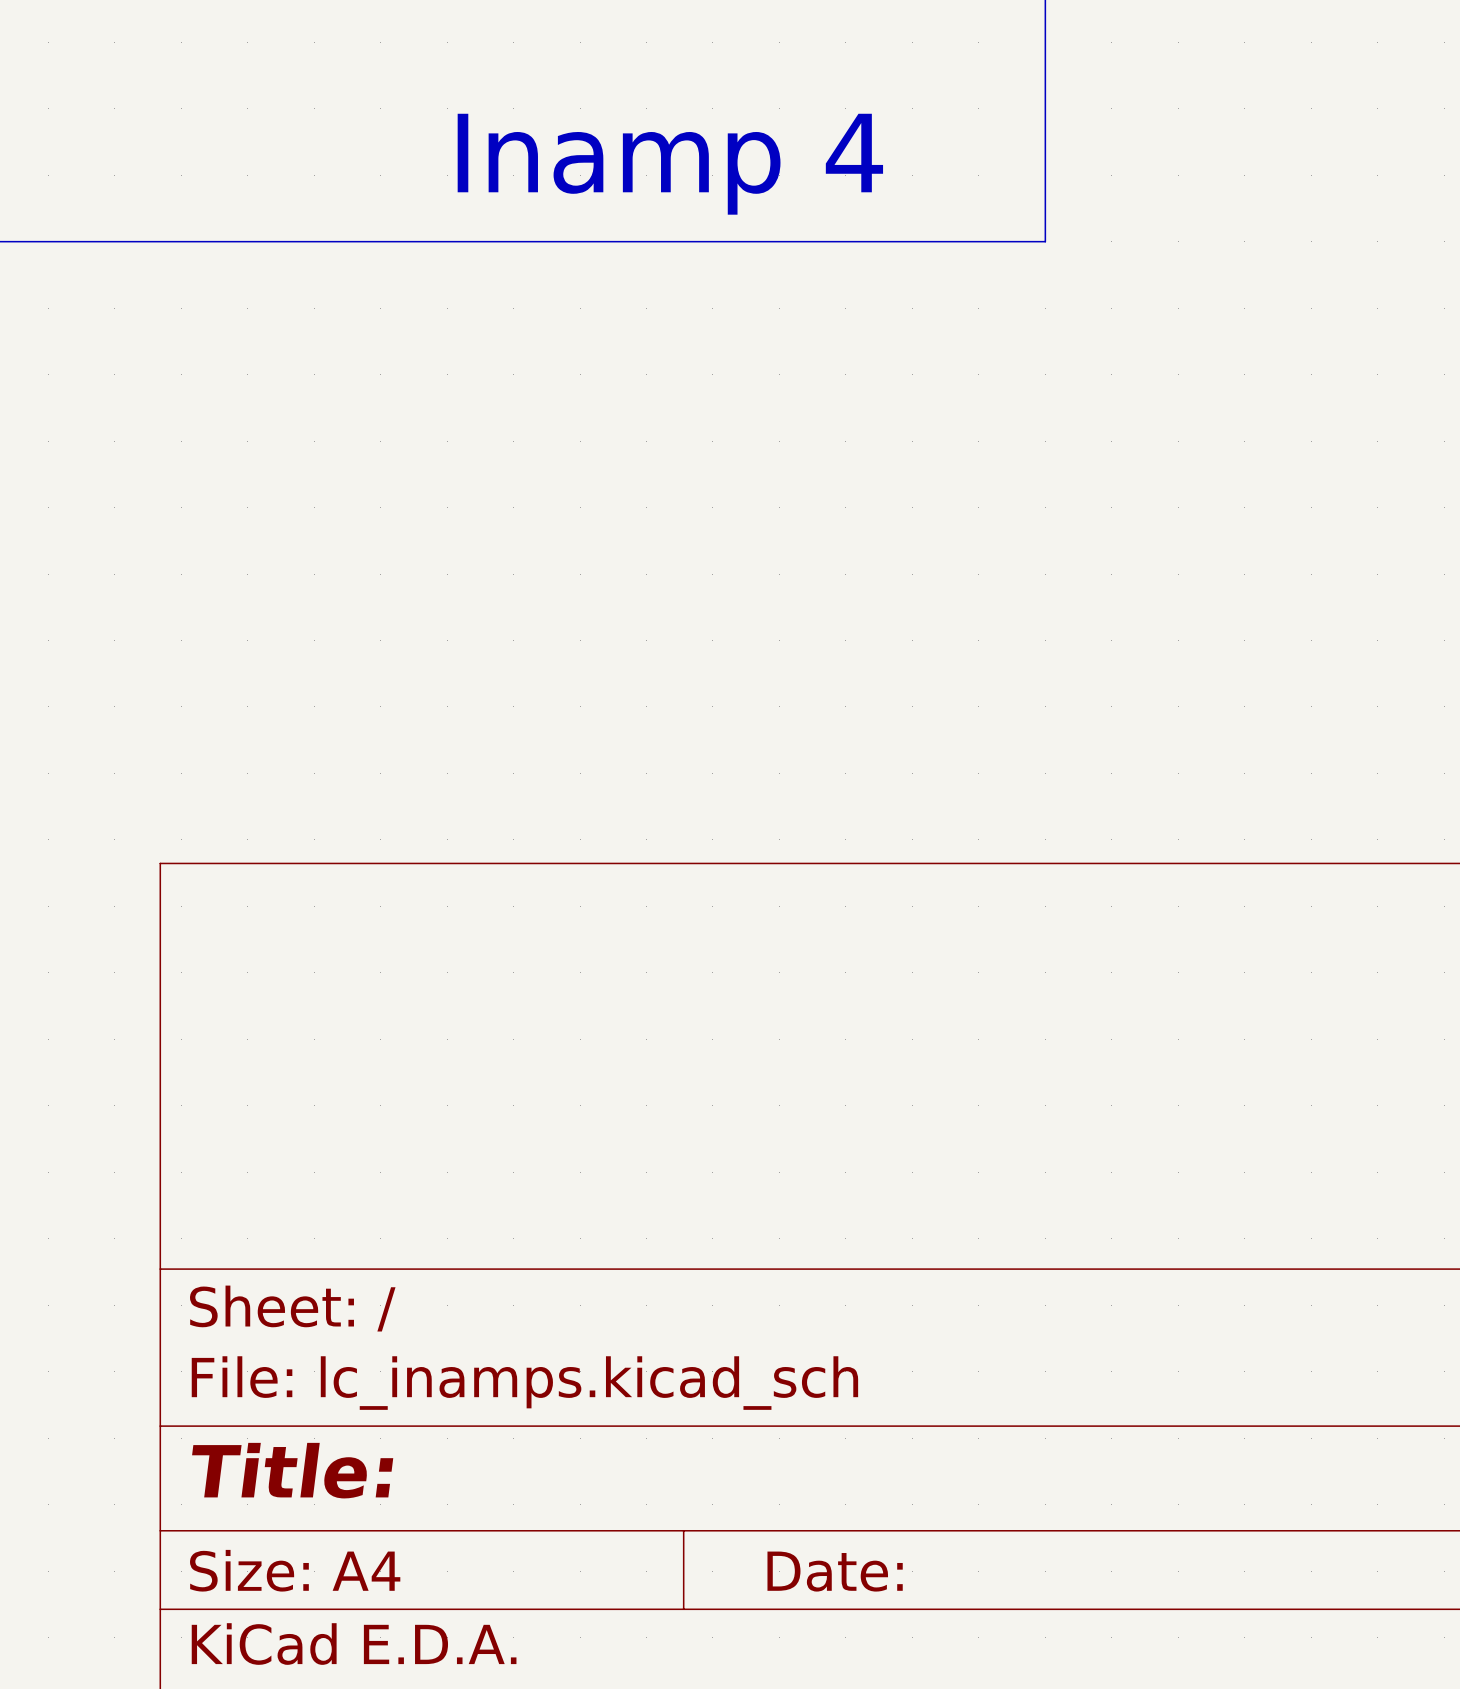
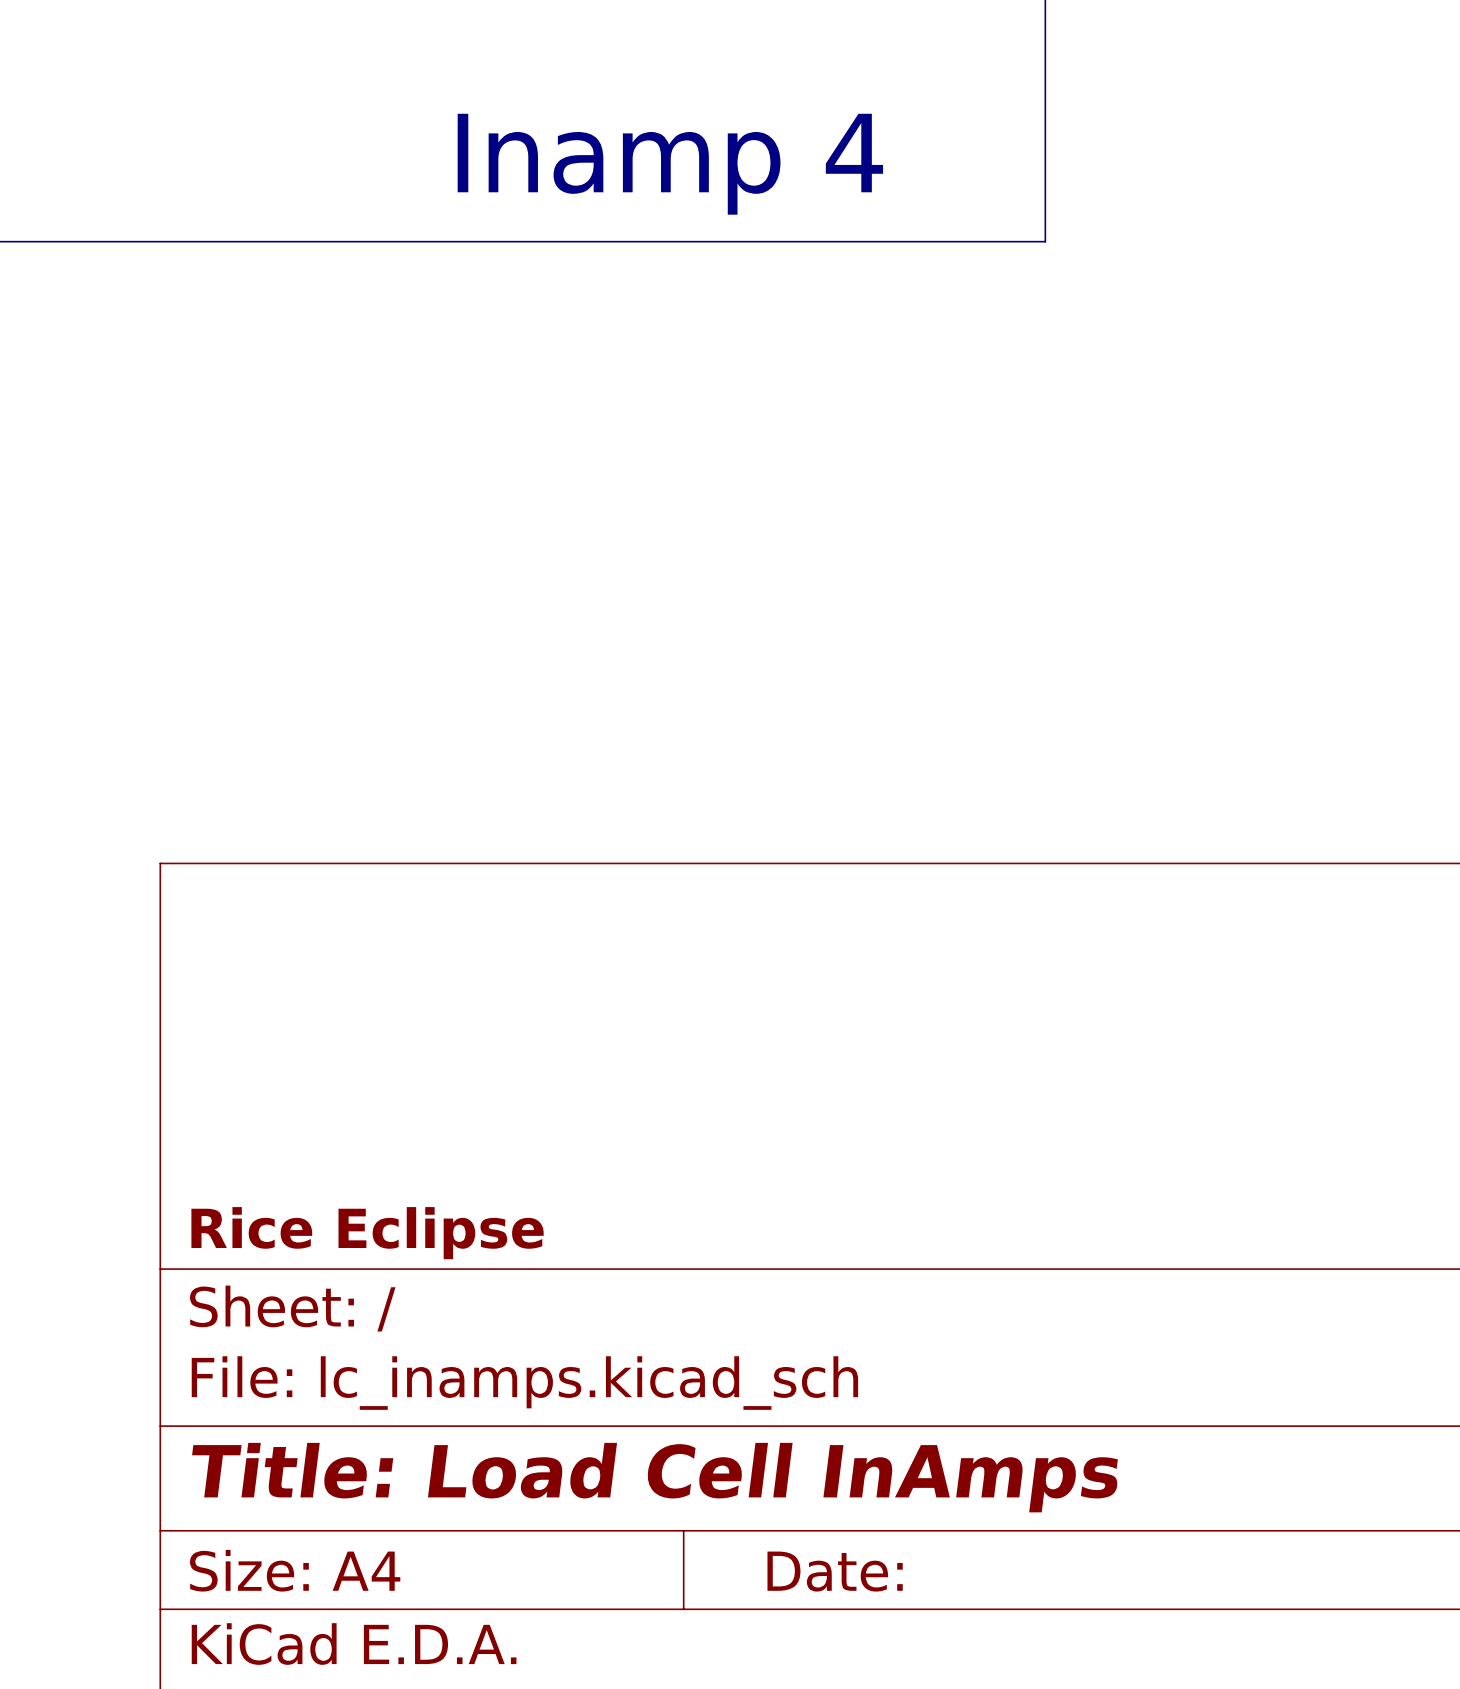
title block: none -> Rice Eclipse (367, 1233)
title block: Title: (292, 1470) -> Title: Load Cell InAmps (655, 1477)

